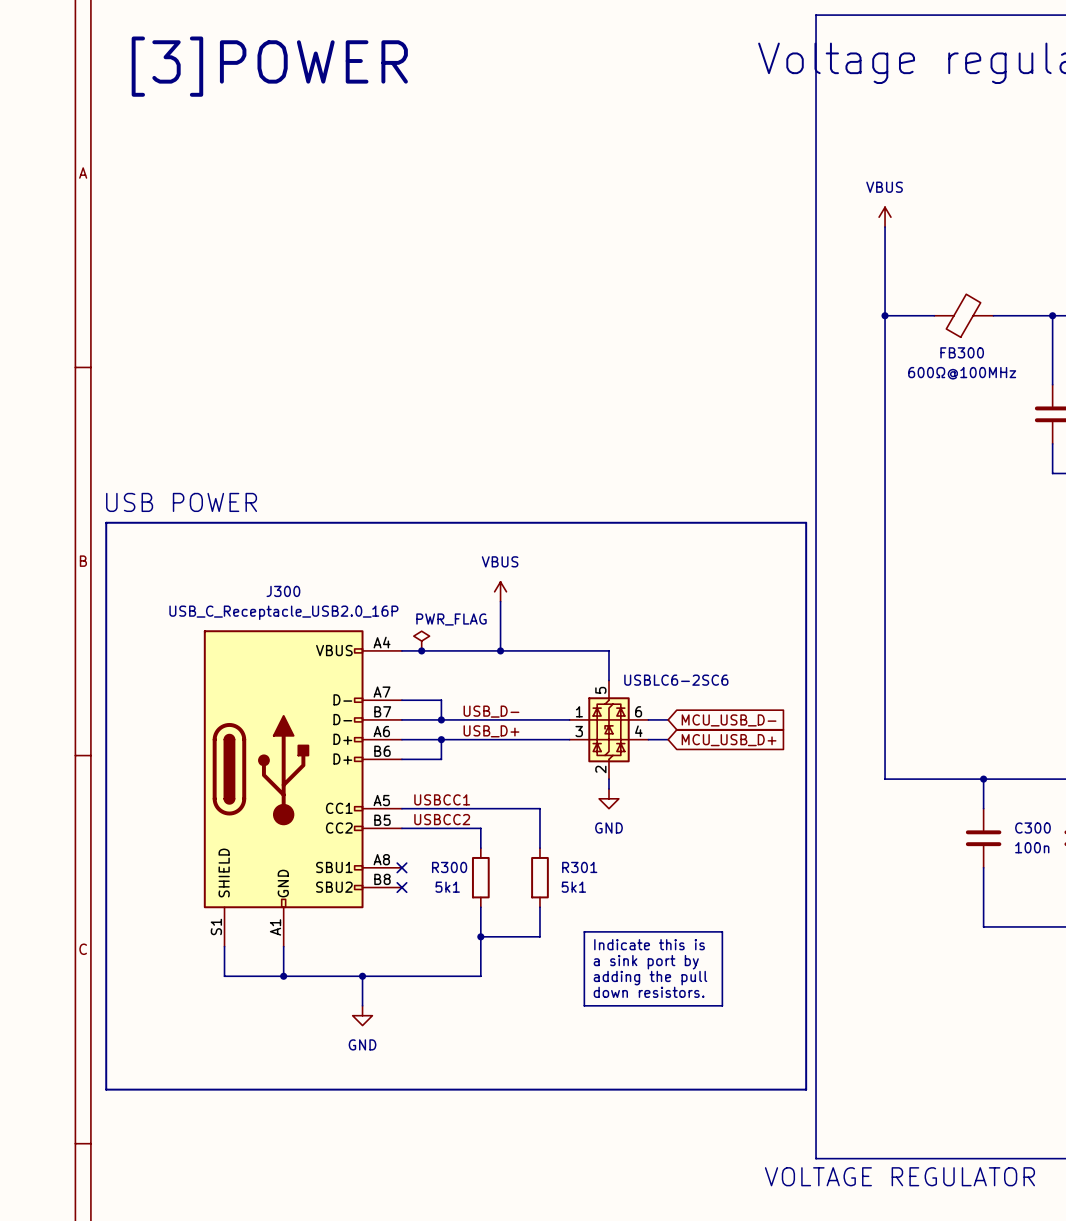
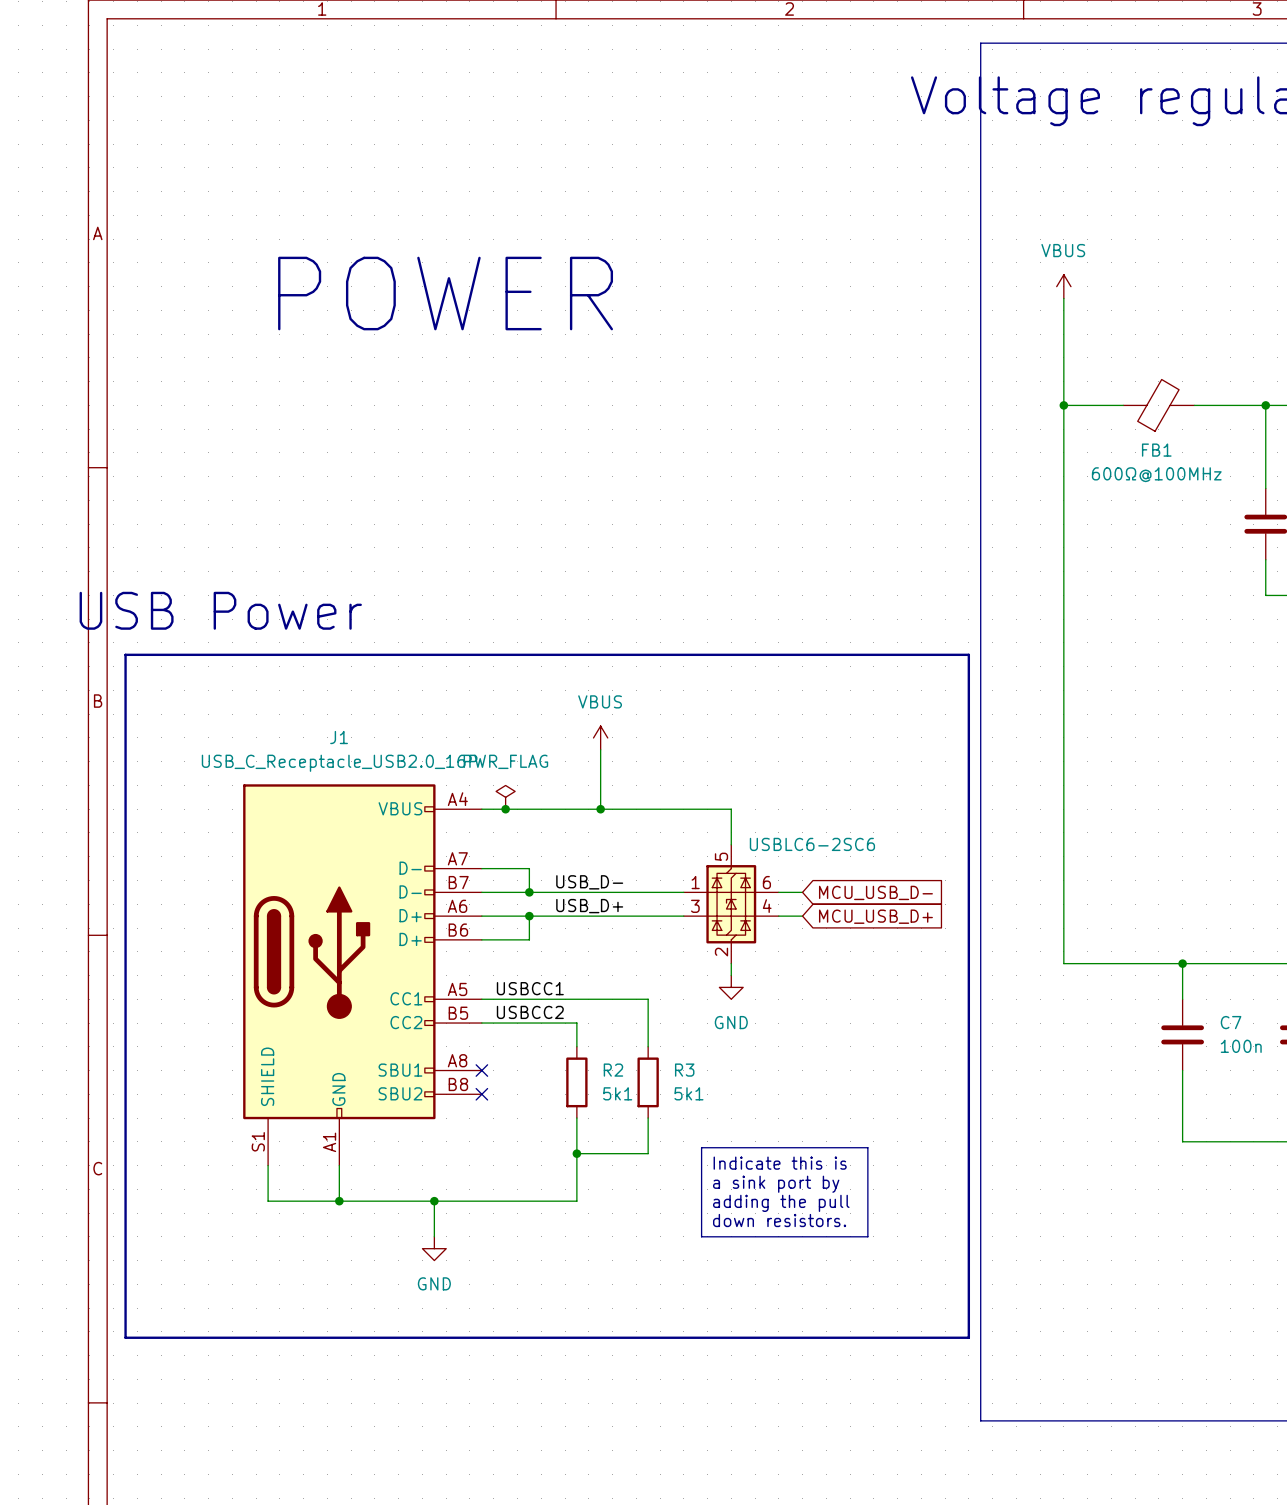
text: [3]POWER (269, 66) -> none
text: none -> POWER (445, 293)
FB300 name: FB300 (962, 352) -> FB1 (1156, 450)
text: none -> USB Power (220, 610)
text: USB POWER (181, 502) -> none
J300 name: J300 (283, 591) -> J1 (339, 737)
power symbol text position: PWR_FLAG (451, 619) -> PWR_FLAG (505, 761)
C300 name: C300 (1032, 828) -> C7 (1231, 1022)
R300 name: R300 (449, 867) -> R2 (613, 1070)
R301 name: R301 (579, 867) -> R3 (684, 1070)
R300 value position: 5k1 (447, 887) -> 5k1 (617, 1093)
text: VOLTAGE REGULATOR (899, 1176) -> none

